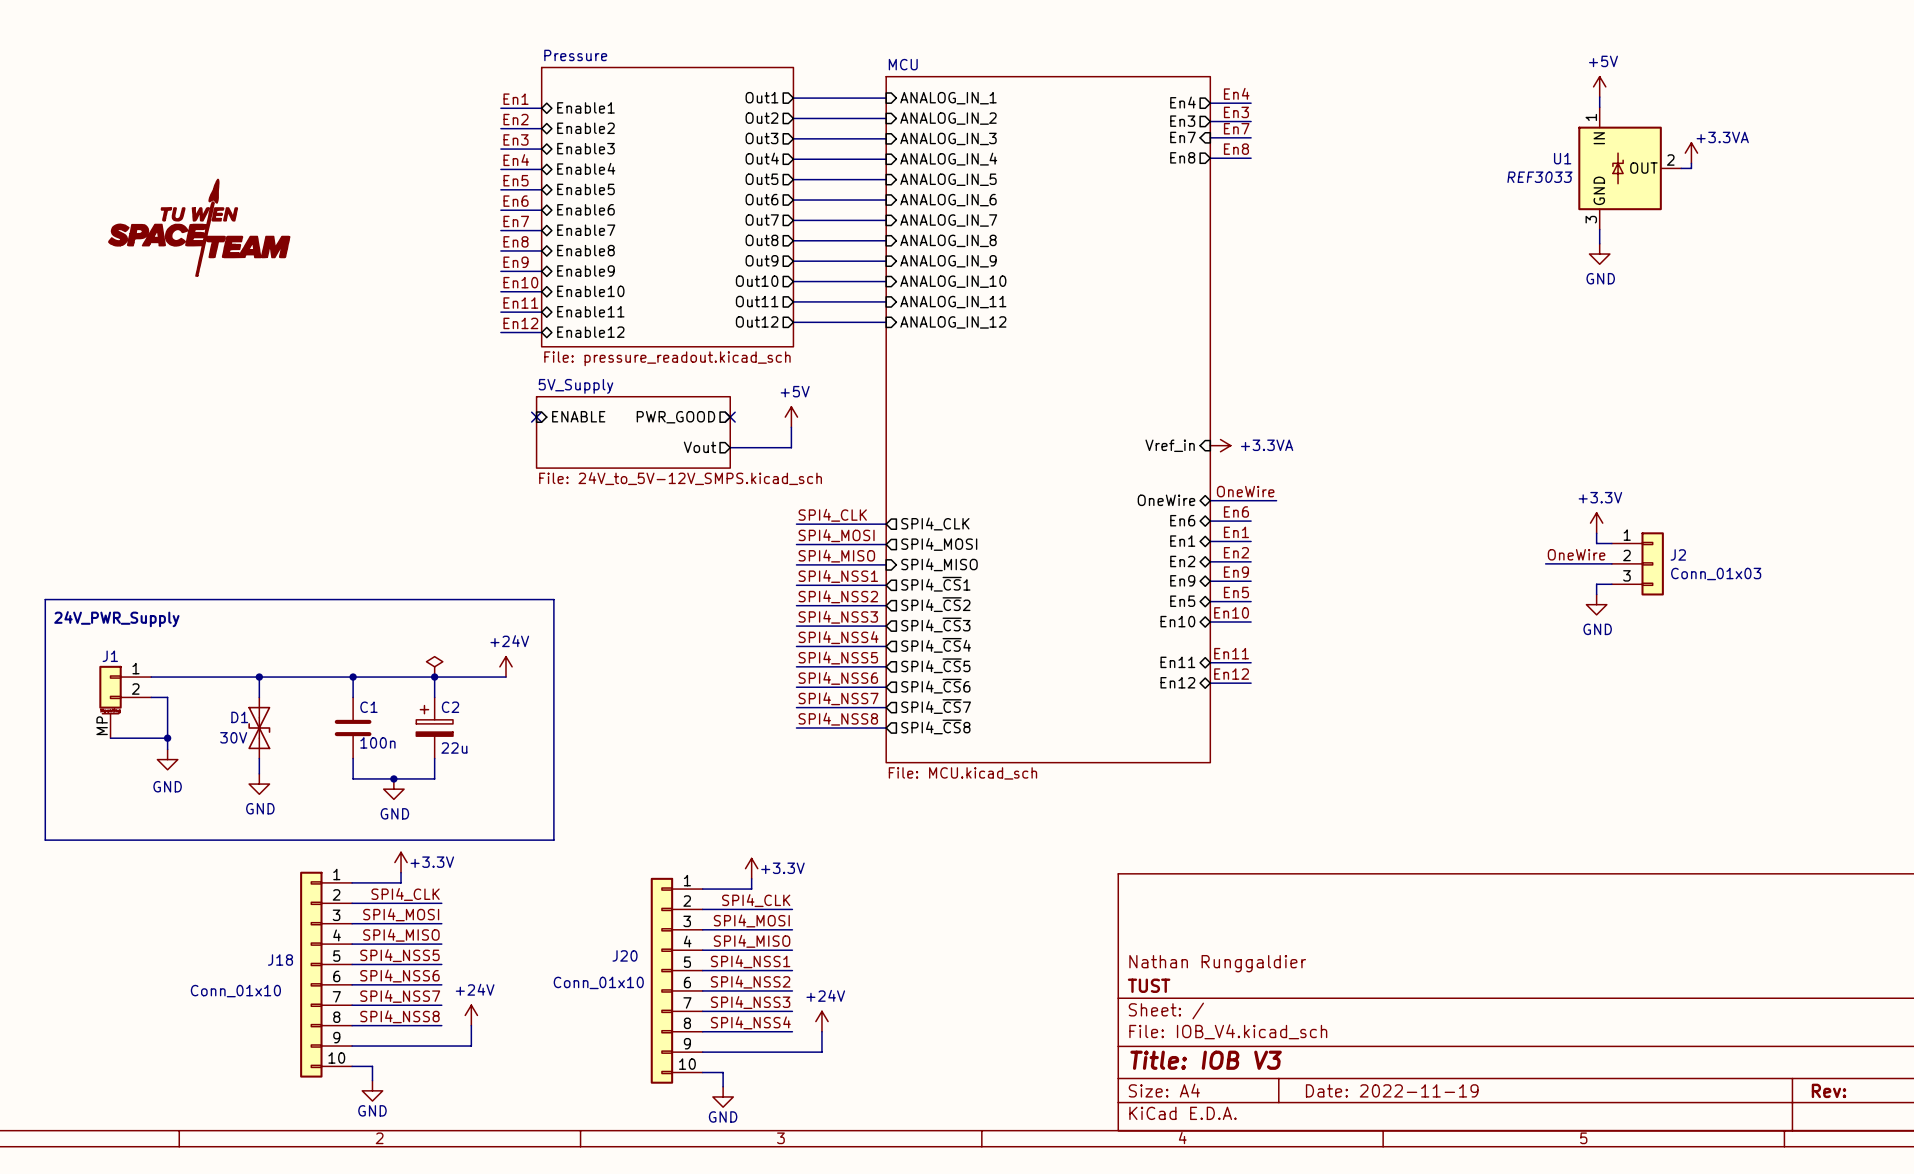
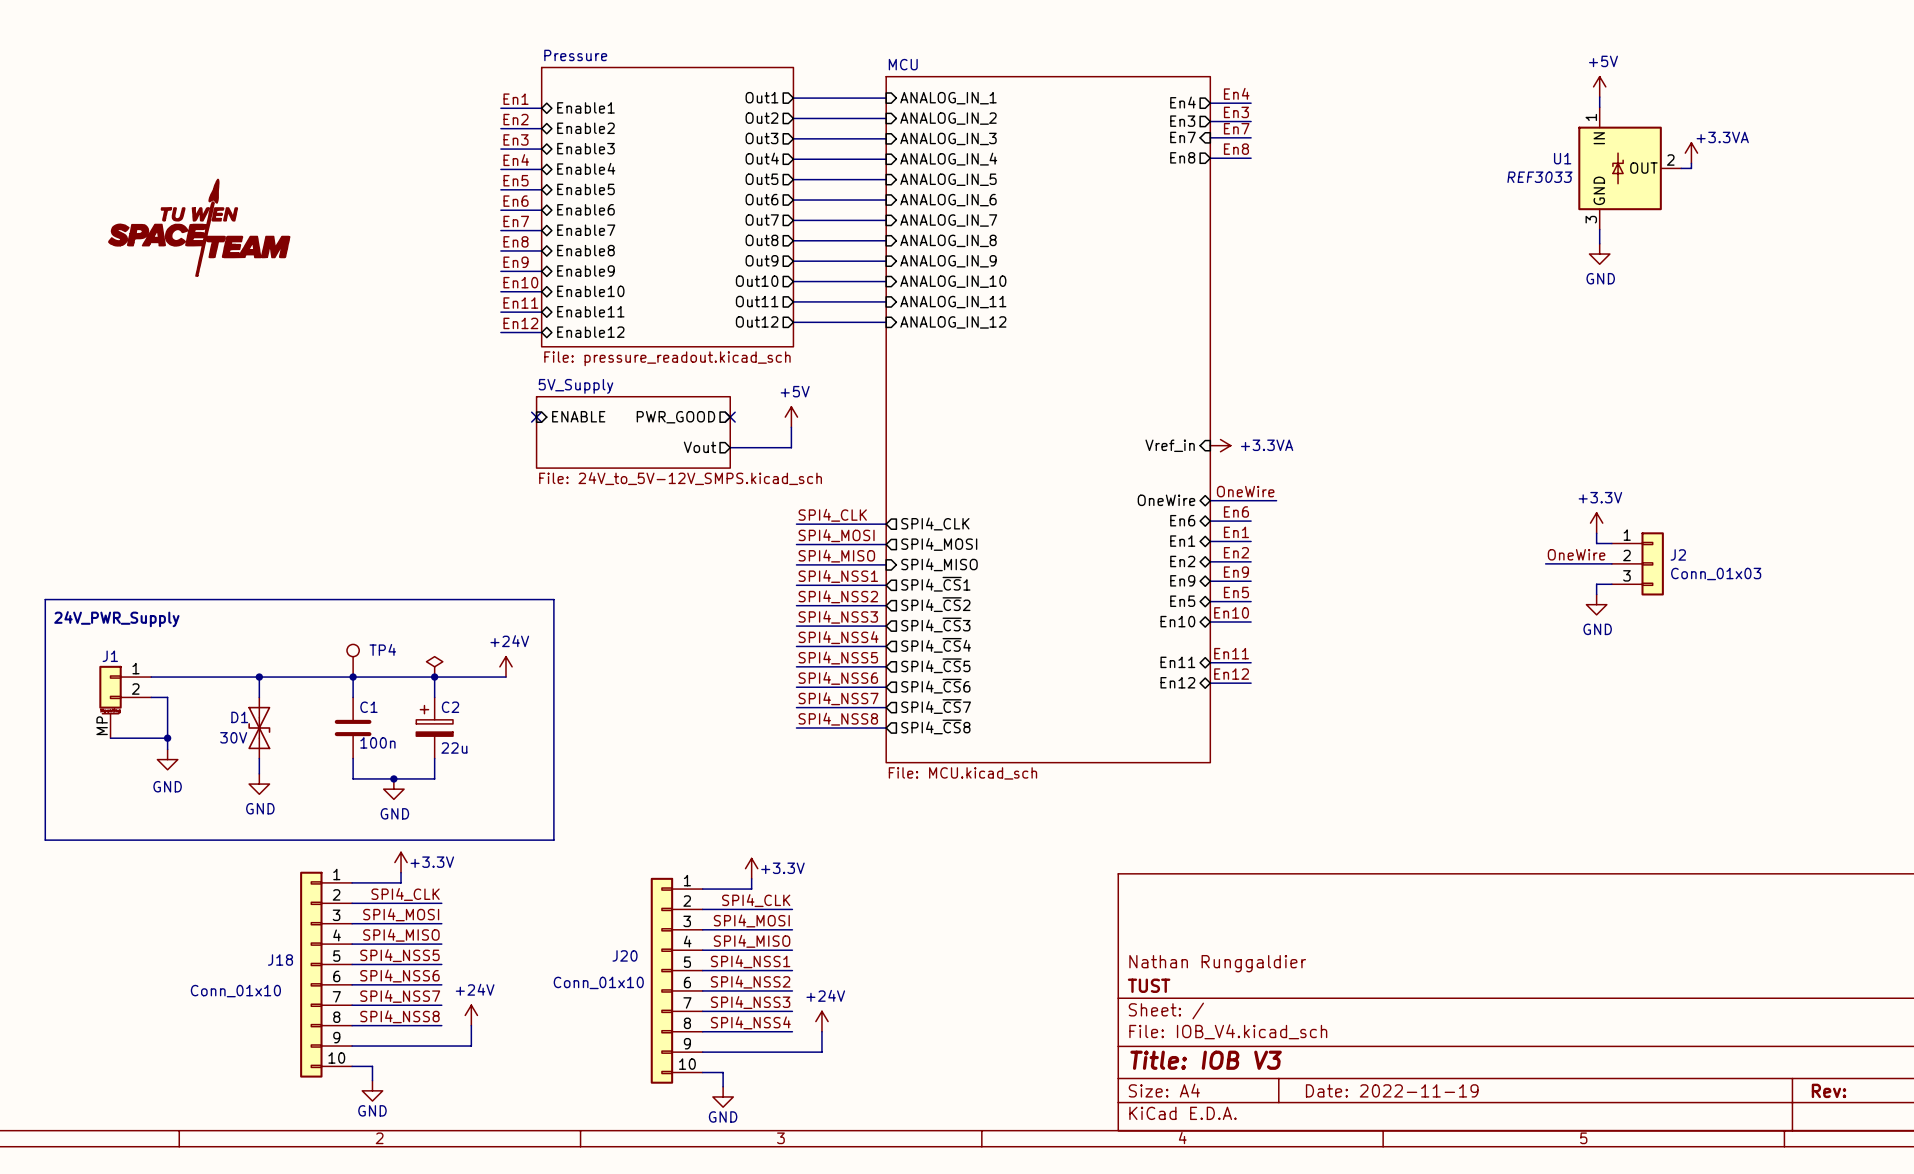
TP4: none -> (353, 660)

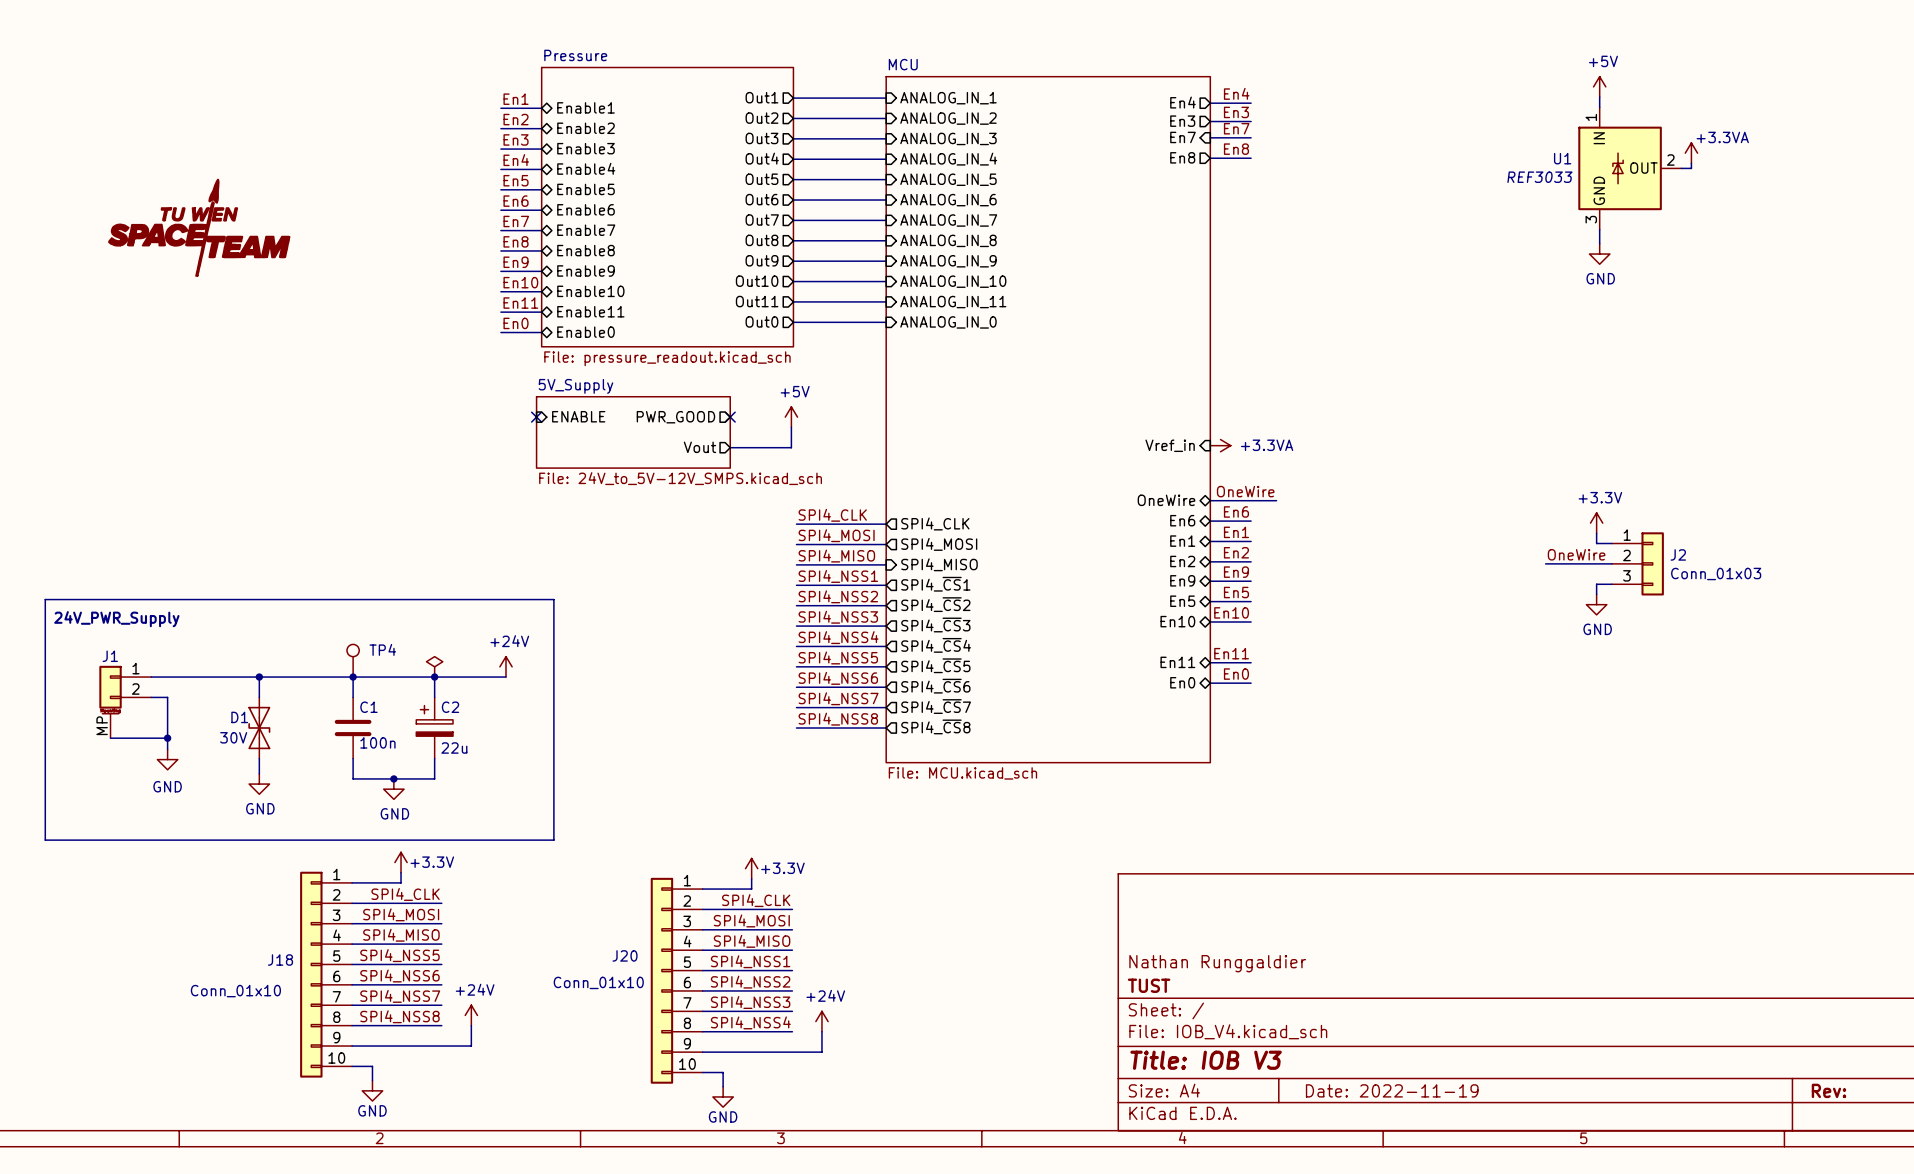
sheet pin: Out12 (757, 321) -> Out0 (761, 321)
sheet pin: ANALOG_IN_12 (953, 322) -> ANALOG_IN_0 (948, 322)
label: En12 (520, 323) -> En0 (516, 323)
sheet pin: Enable12 (590, 332) -> Enable0 (586, 332)
label: En12 (1231, 674) -> En0 (1236, 674)
sheet pin: En12 (1177, 682) -> En0 (1182, 682)

